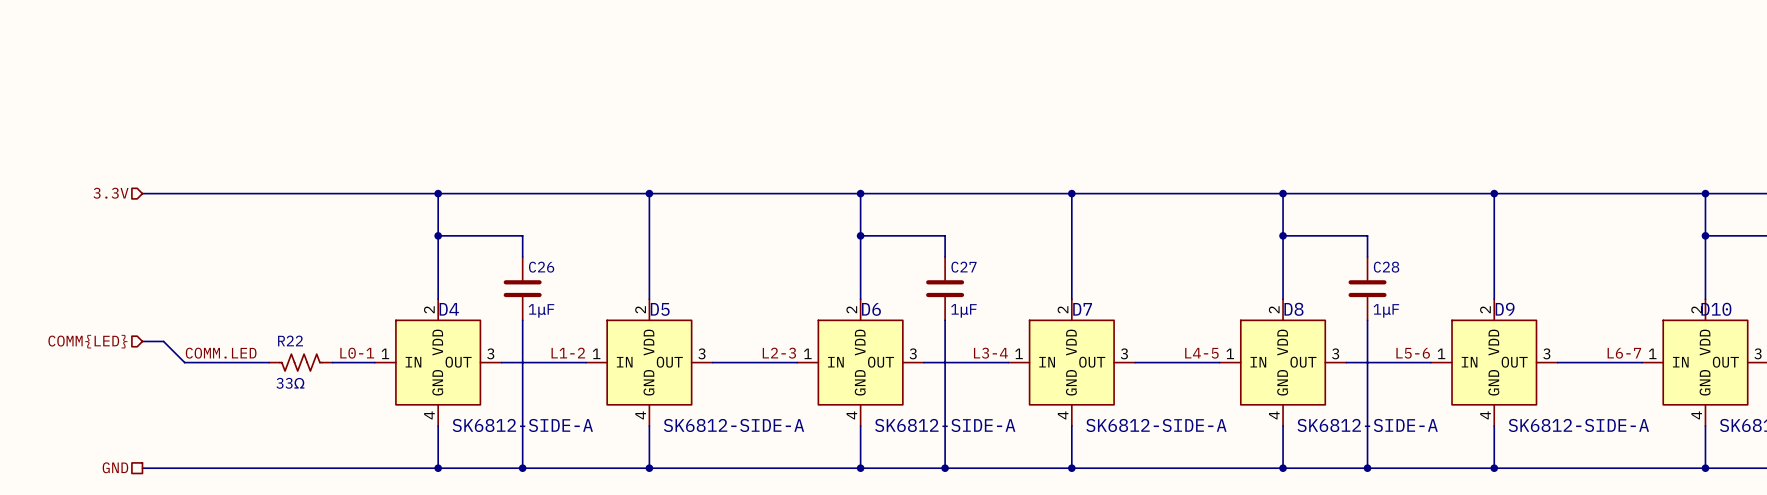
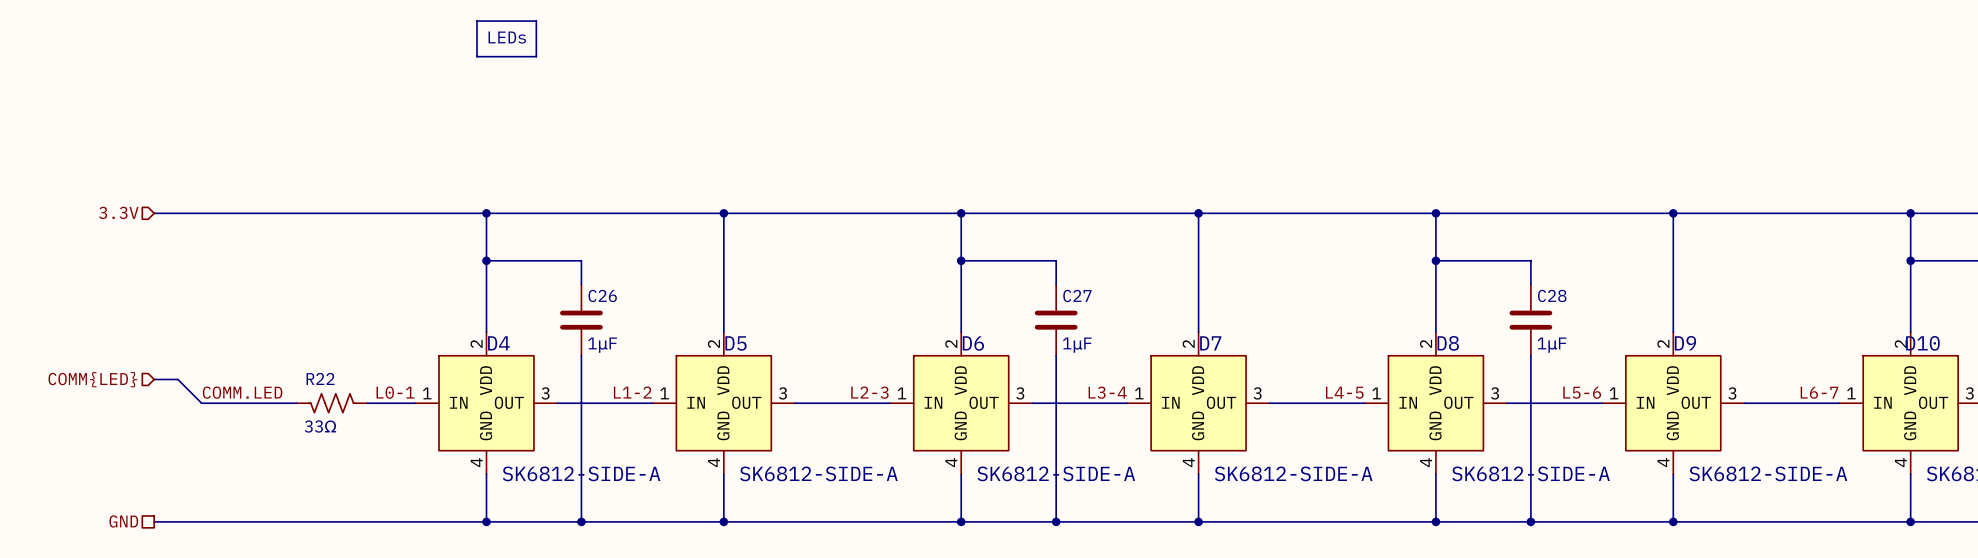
line: none -> (476, 21) (536, 21) (536, 56) (476, 56) (476, 21)
text: none -> LEDs (507, 37)

